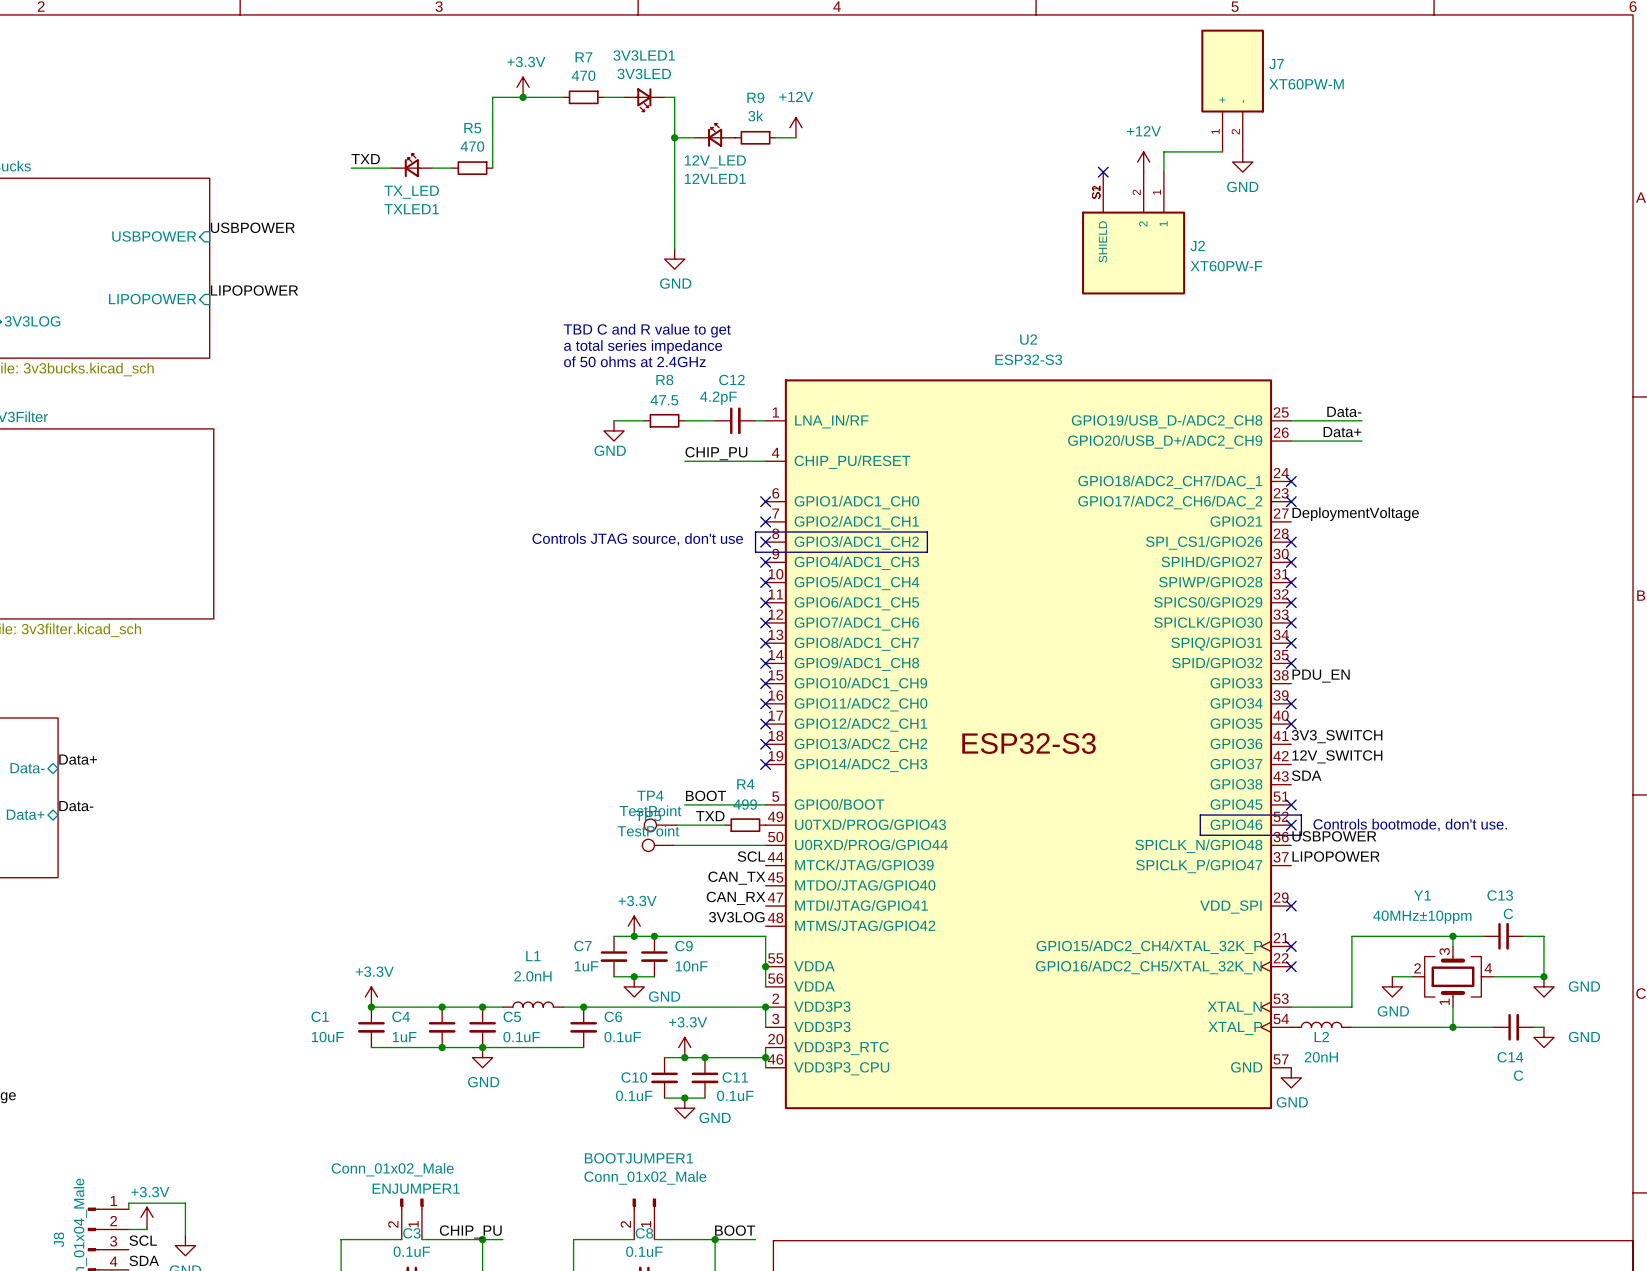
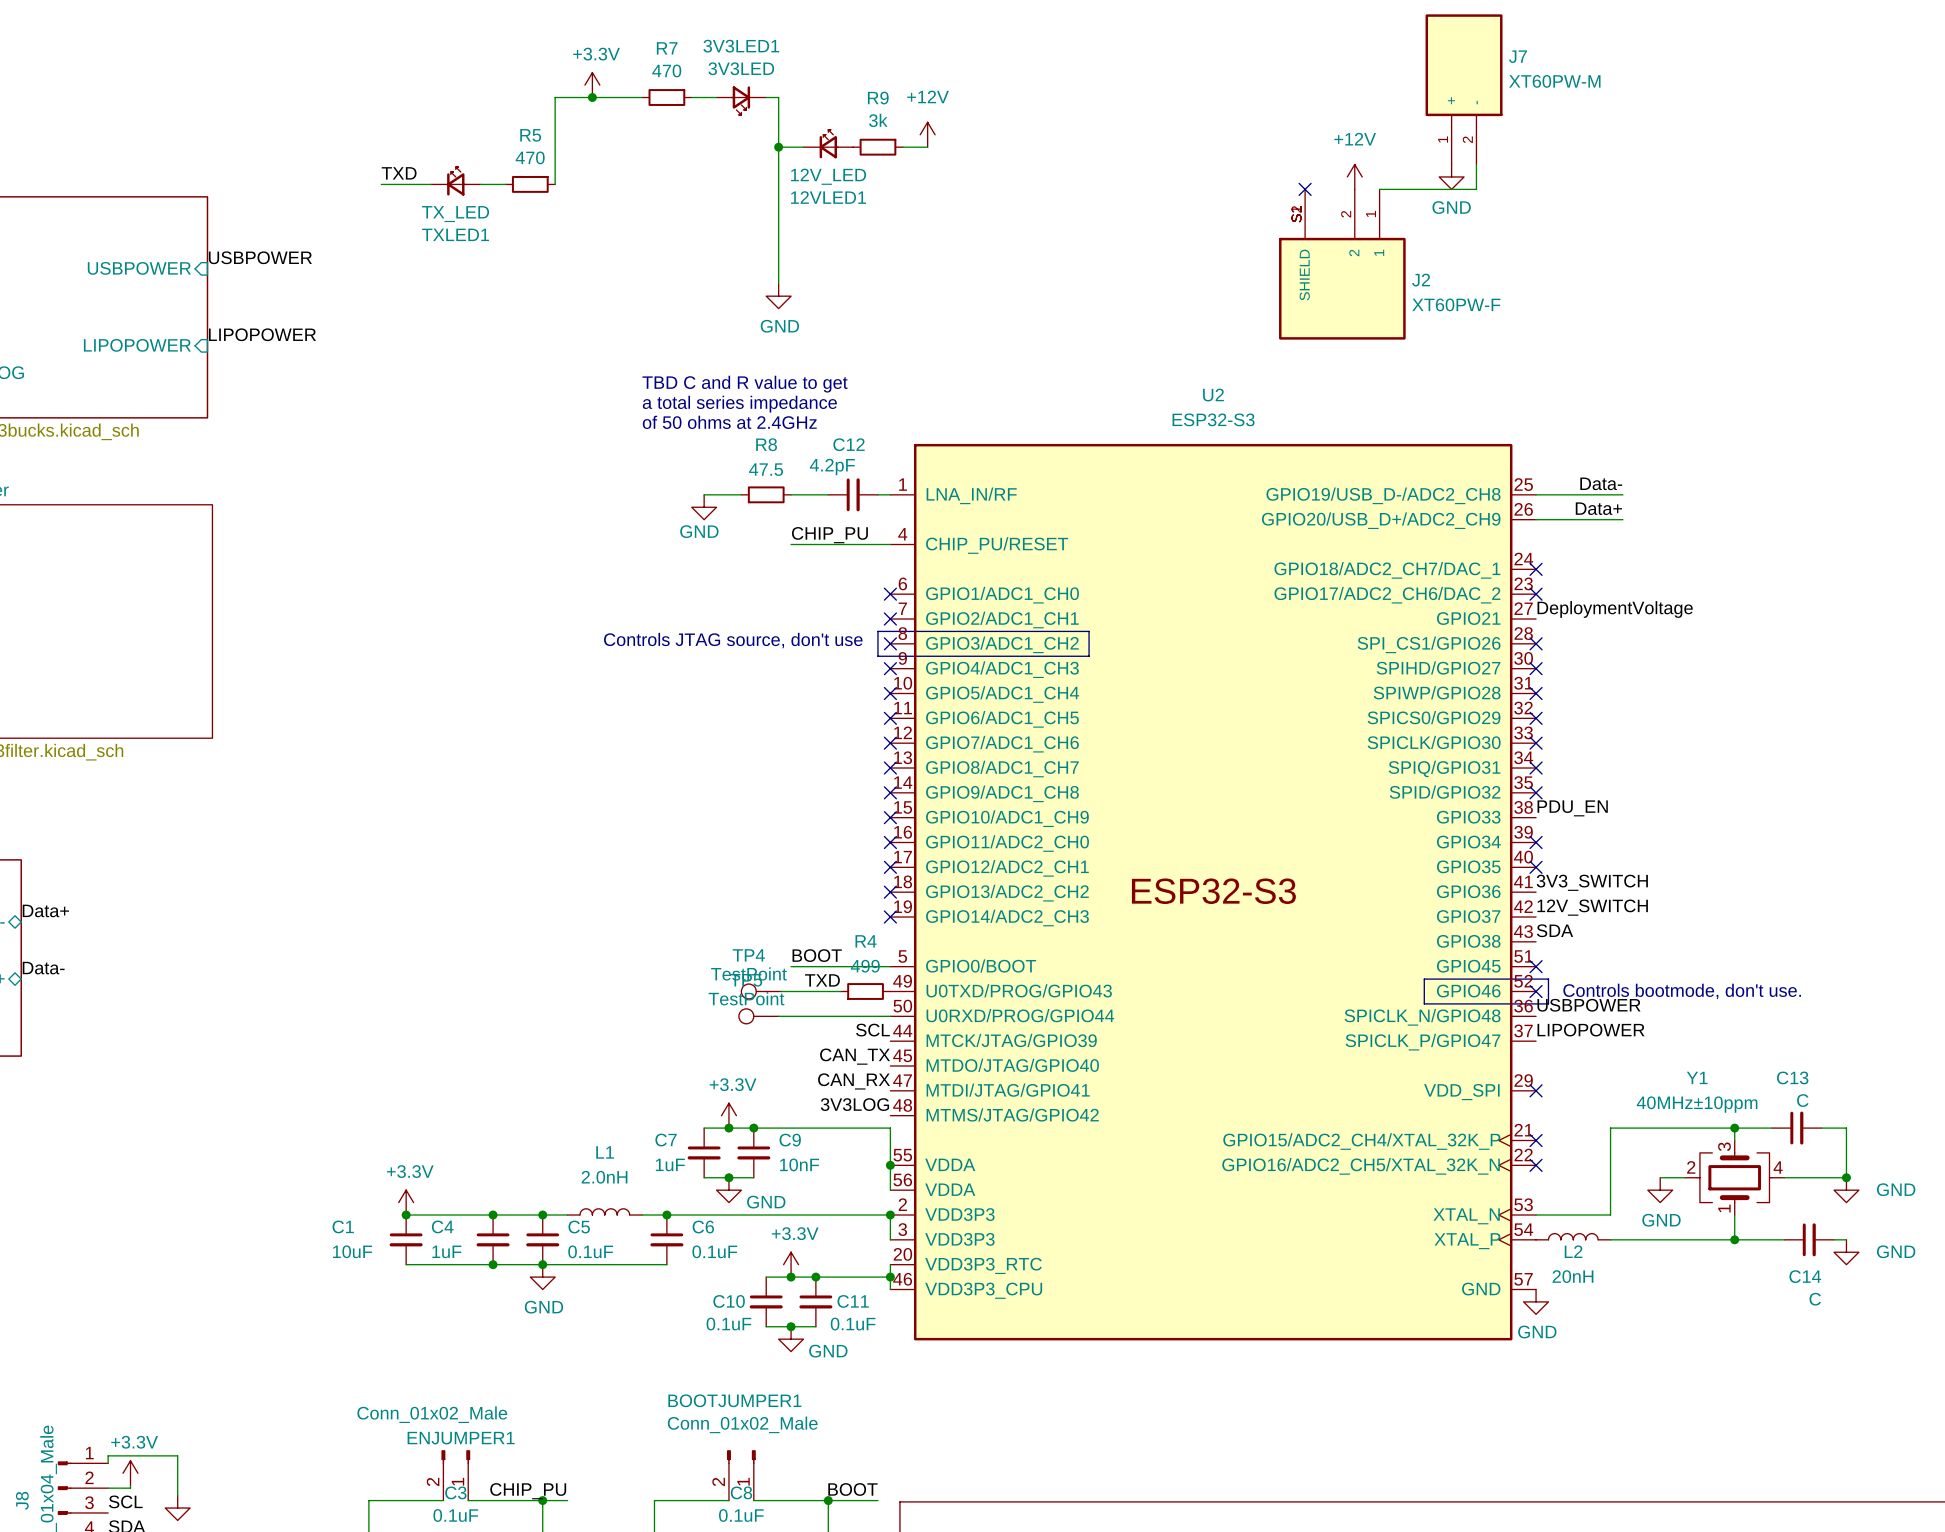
wire: (1222, 151) (1163, 151) (1163, 172) -> (1476, 164) (1476, 189) (1379, 189)
power symbol position: GND (1242, 162) -> GND (1451, 176)

